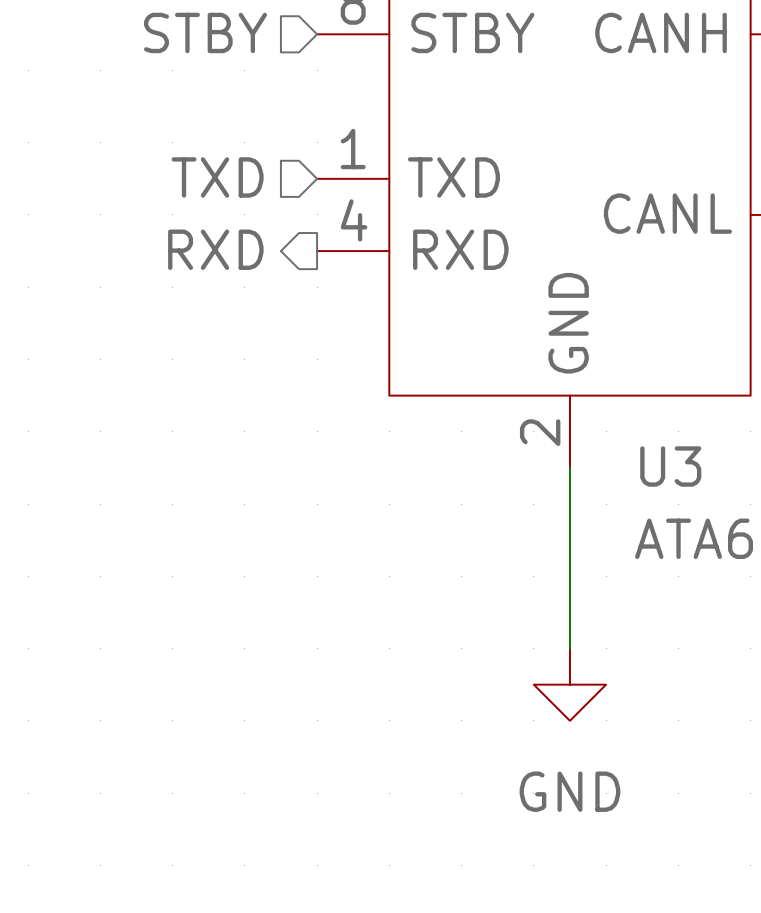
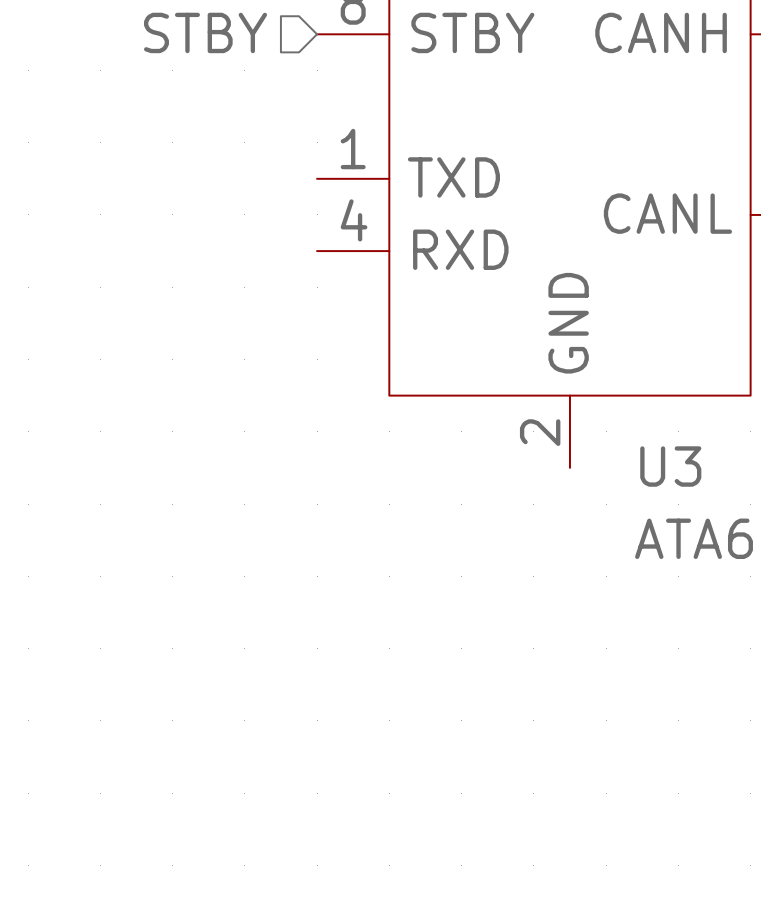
hierarchical label: TXD (217, 177) -> none
hierarchical label: RXD (215, 249) -> none
wire: (569, 467) (569, 648) -> none
power symbol: GND (569, 684) -> none

